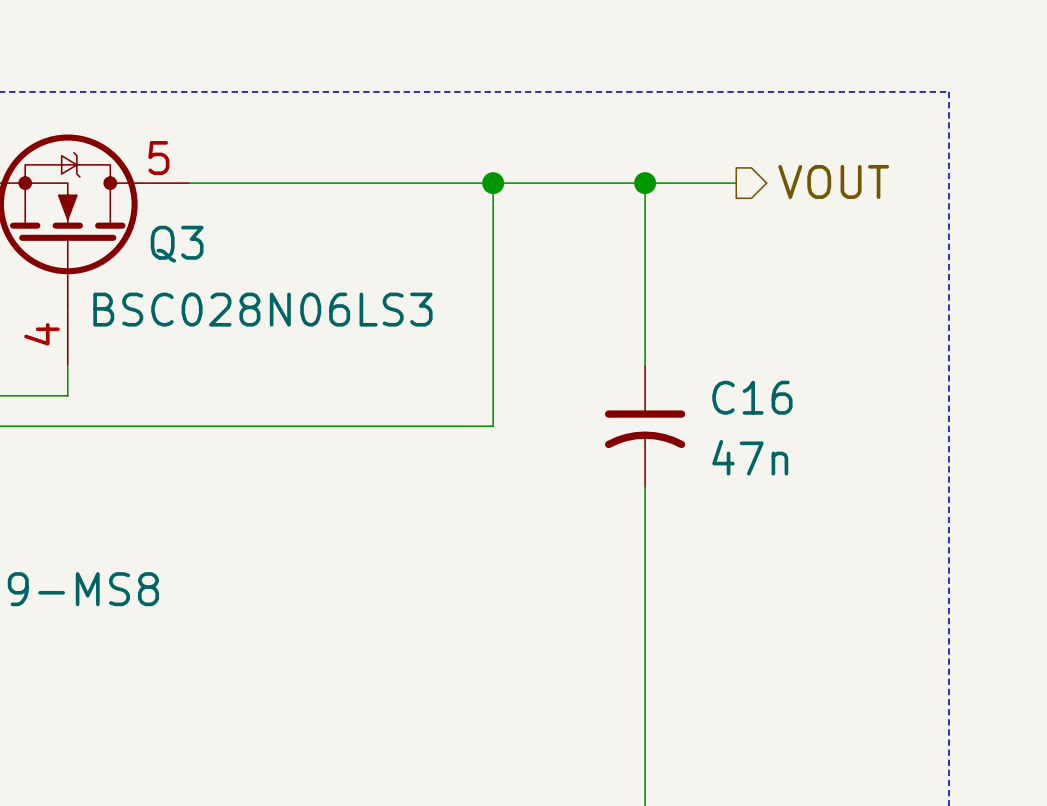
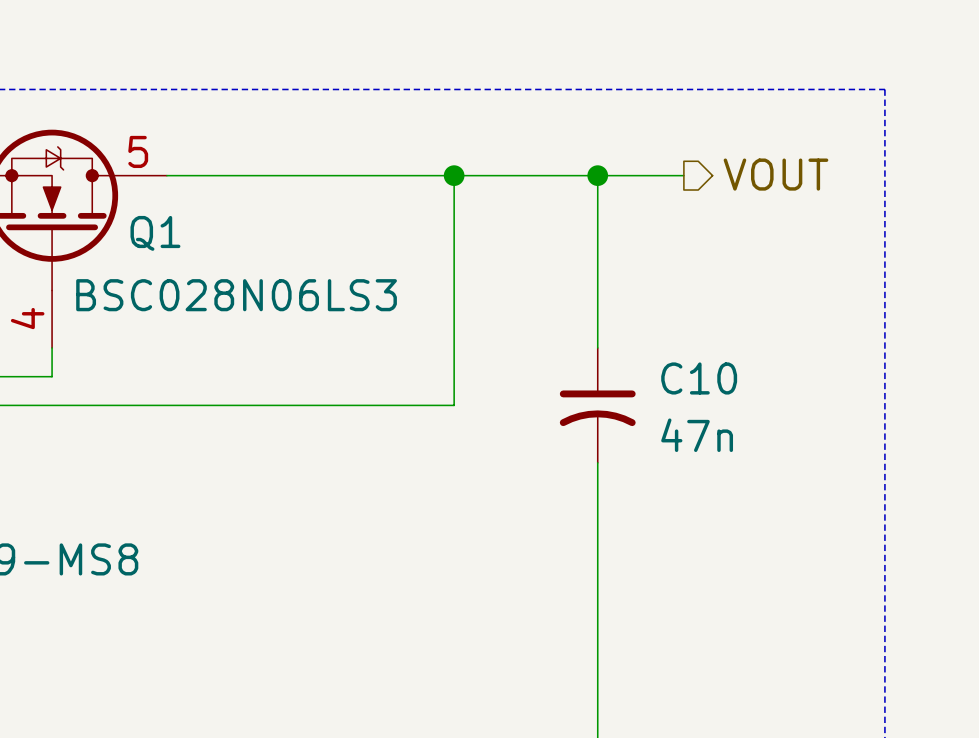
Q3 name: Q3 (177, 244) -> Q1 (155, 233)
C16 name: C16 (752, 397) -> C10 (699, 378)

